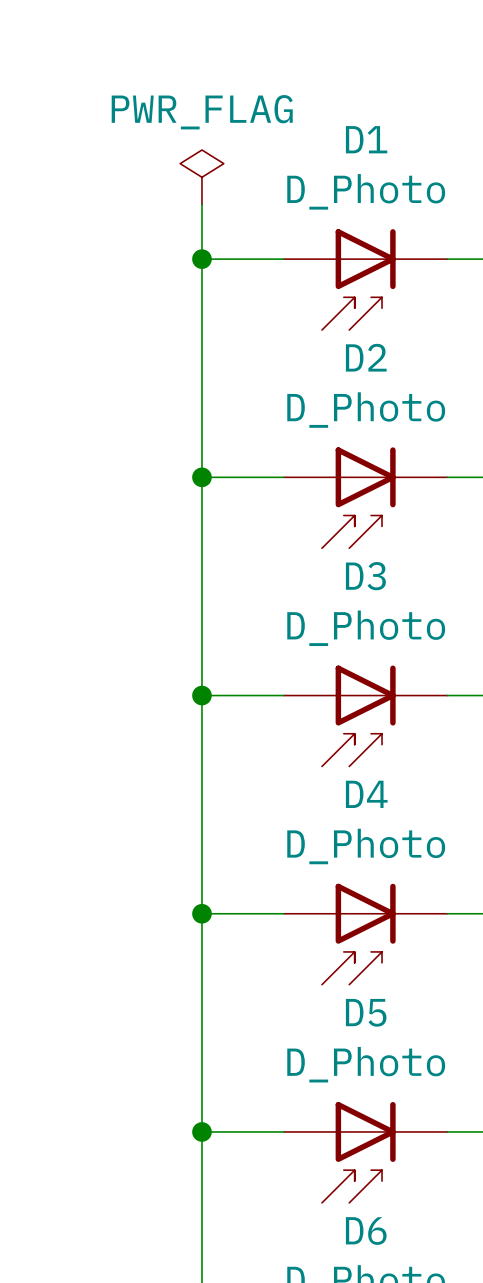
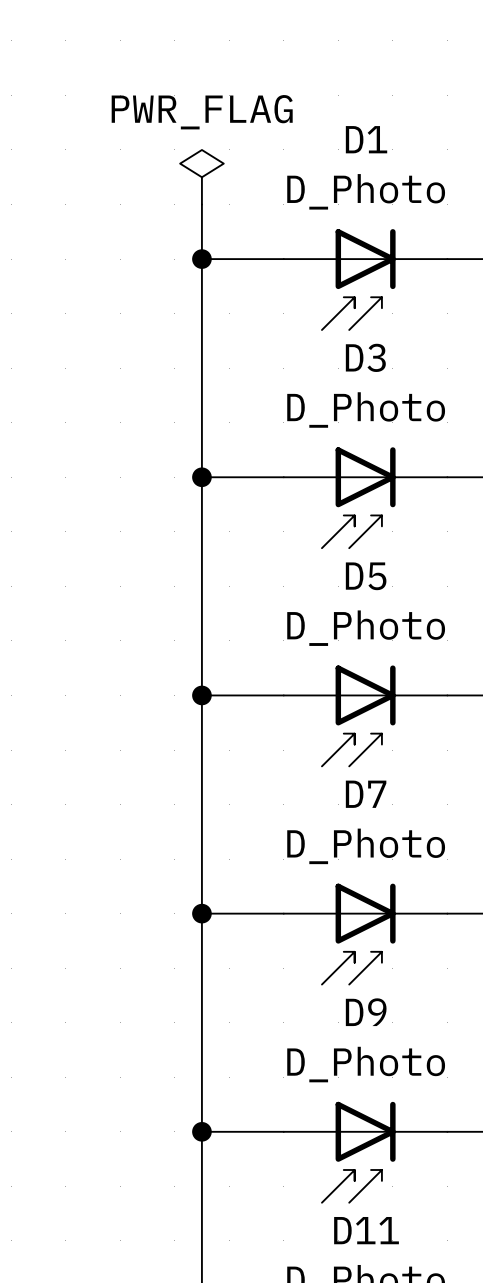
D2 name: D2 (366, 357) -> D3 (365, 357)
D3 name: D3 (365, 576) -> D5 (366, 576)
D4 name: D4 (366, 794) -> D7 (366, 794)
D5 name: D5 (366, 1012) -> D9 (366, 1012)
D6 name: D6 (366, 1231) -> D11 (366, 1230)

